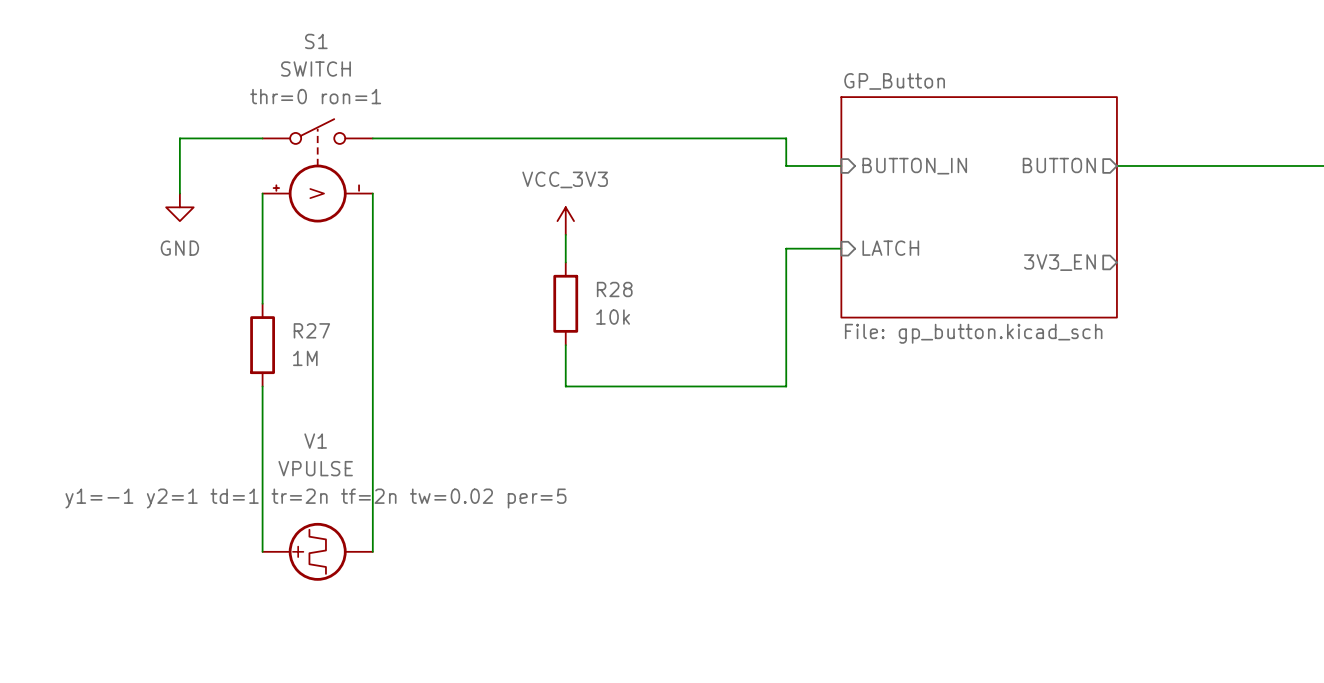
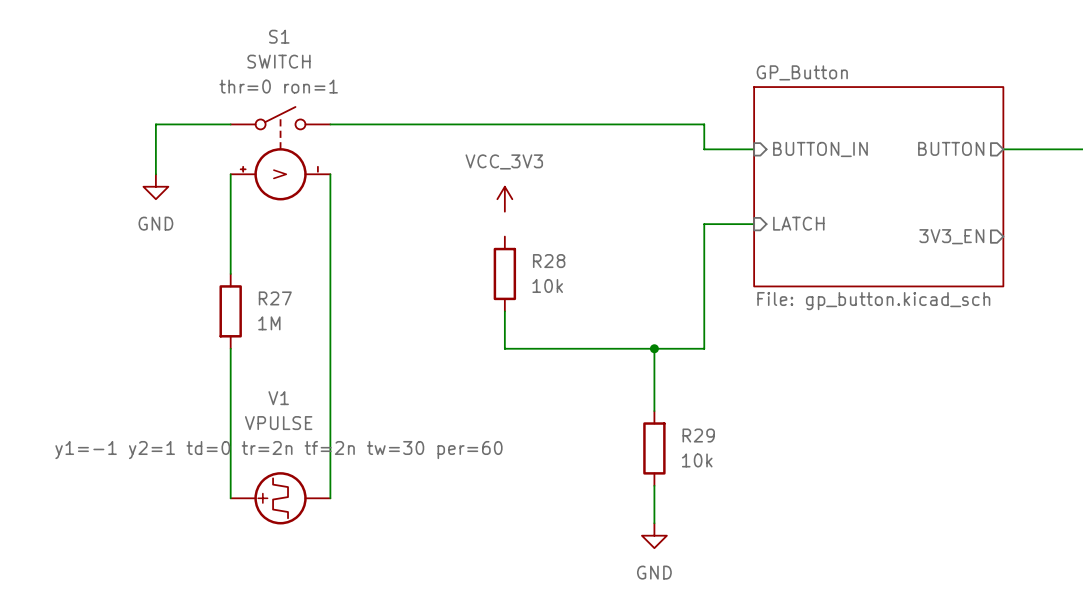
wire: (565, 234) (565, 262) -> none
wire: none -> (654, 348) (654, 411)
junction: none -> (654, 348)
R29: none -> 10k (654, 448)
V1 text: y1=-1 y2=1 td=1 tr=2n tf=2n tw=0.02 per=5 (315, 498) -> y1=-1 y2=1 td=0 tr=2n tf=2n tw=30 per=60 (278, 450)
wire: none -> (654, 485) (654, 523)
power symbol: none -> GND (654, 535)

